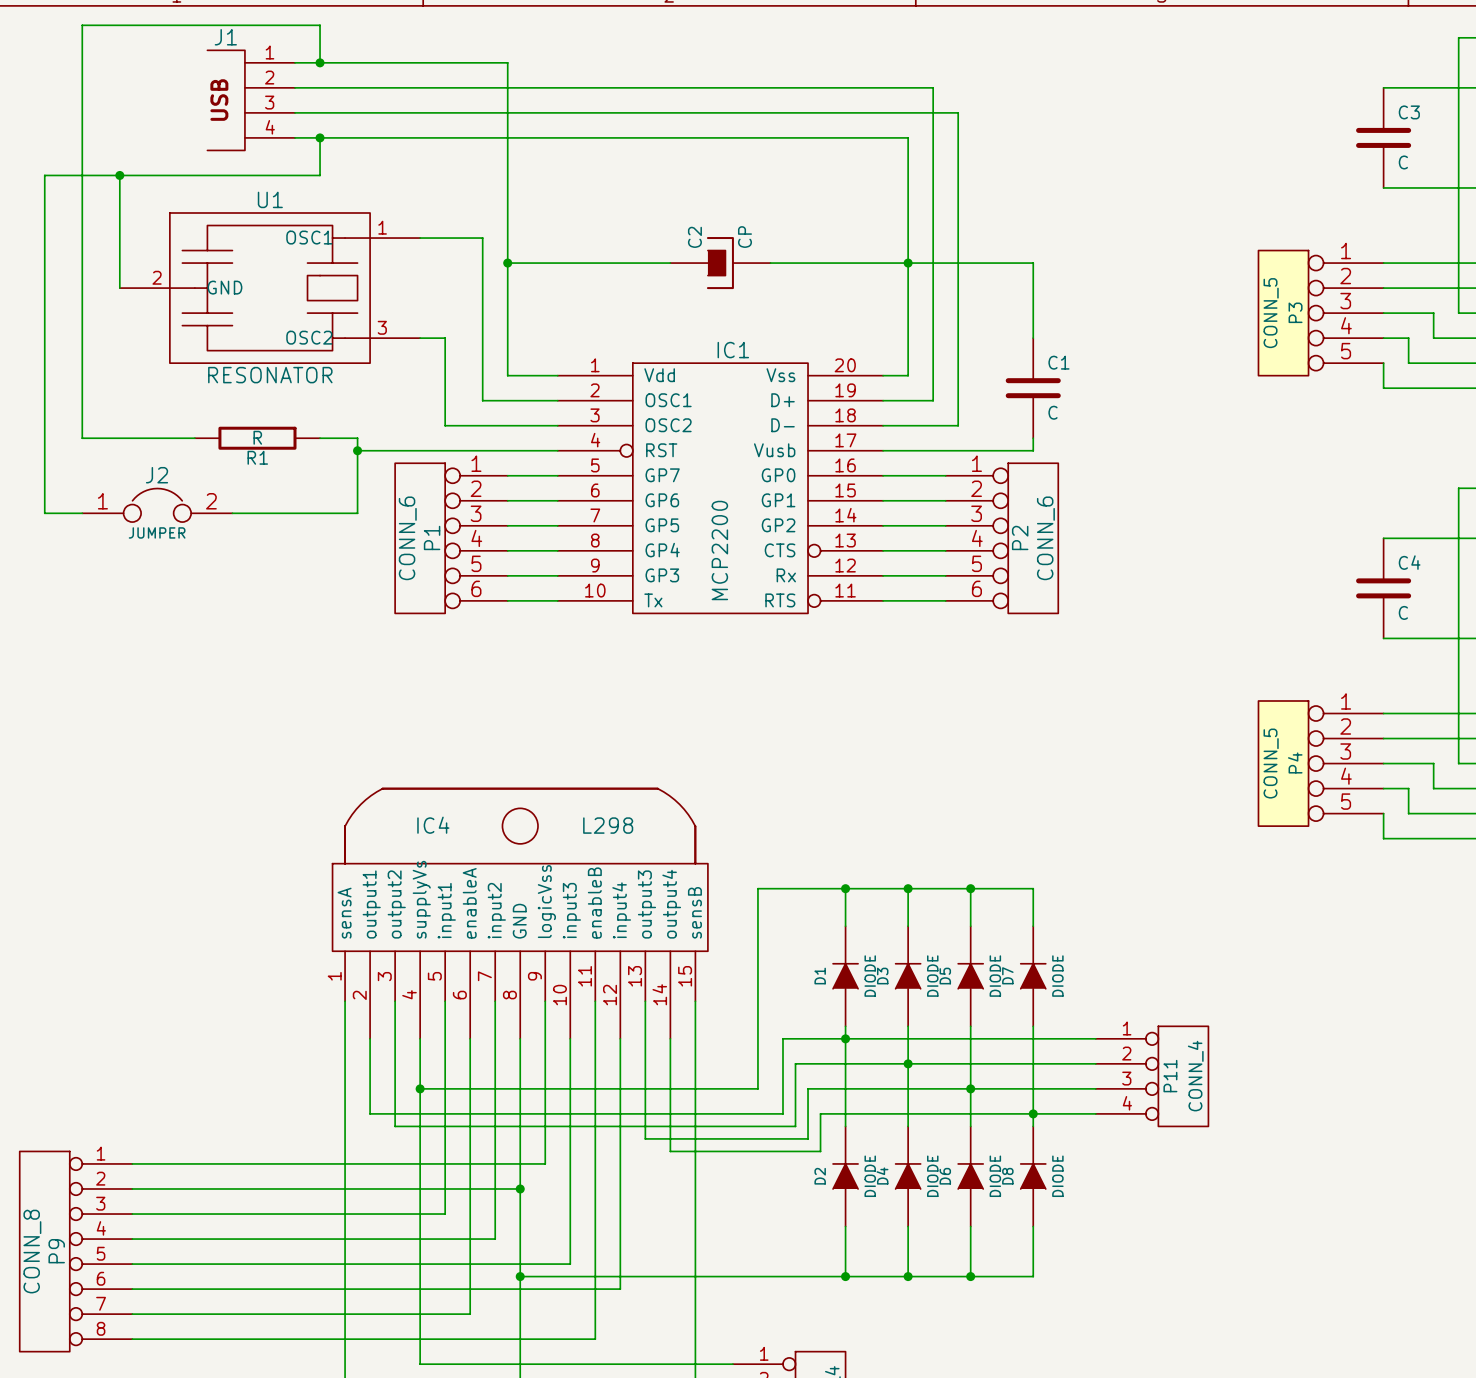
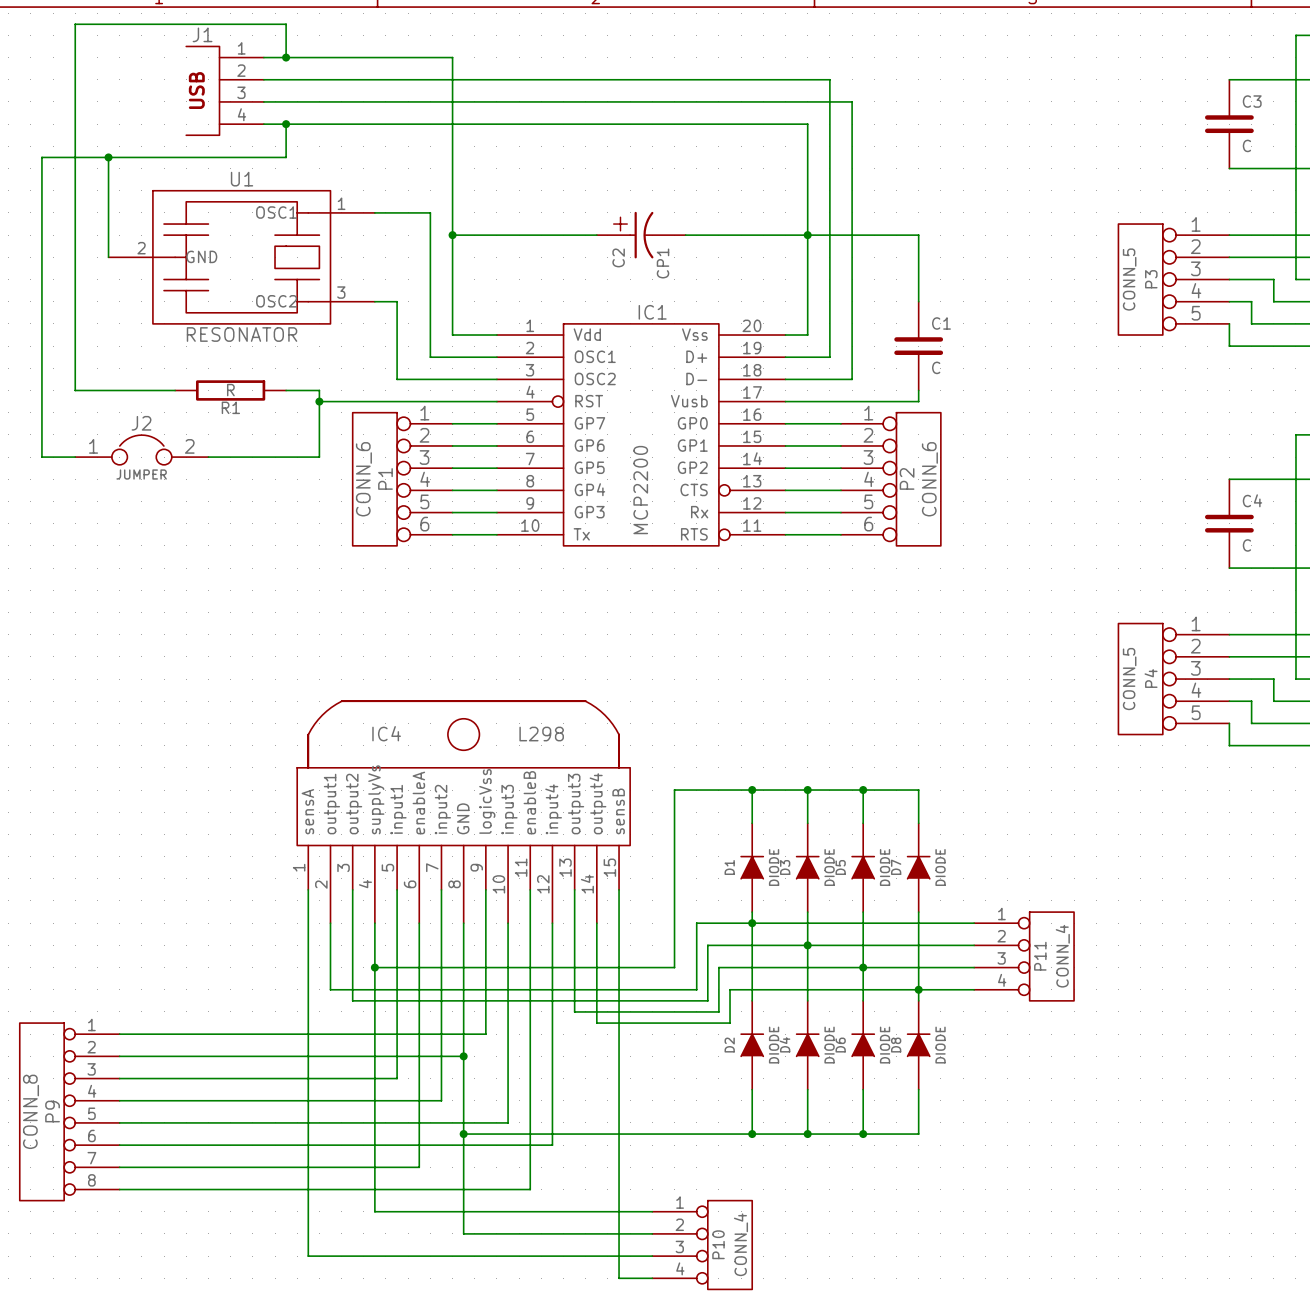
C2 symbol: [670, 237, 771, 290] -> [596, 211, 686, 259]
C2 name position: C2 (694, 237) -> C2 (618, 257)
C2 value: CP (744, 237) -> CP1 (663, 263)

